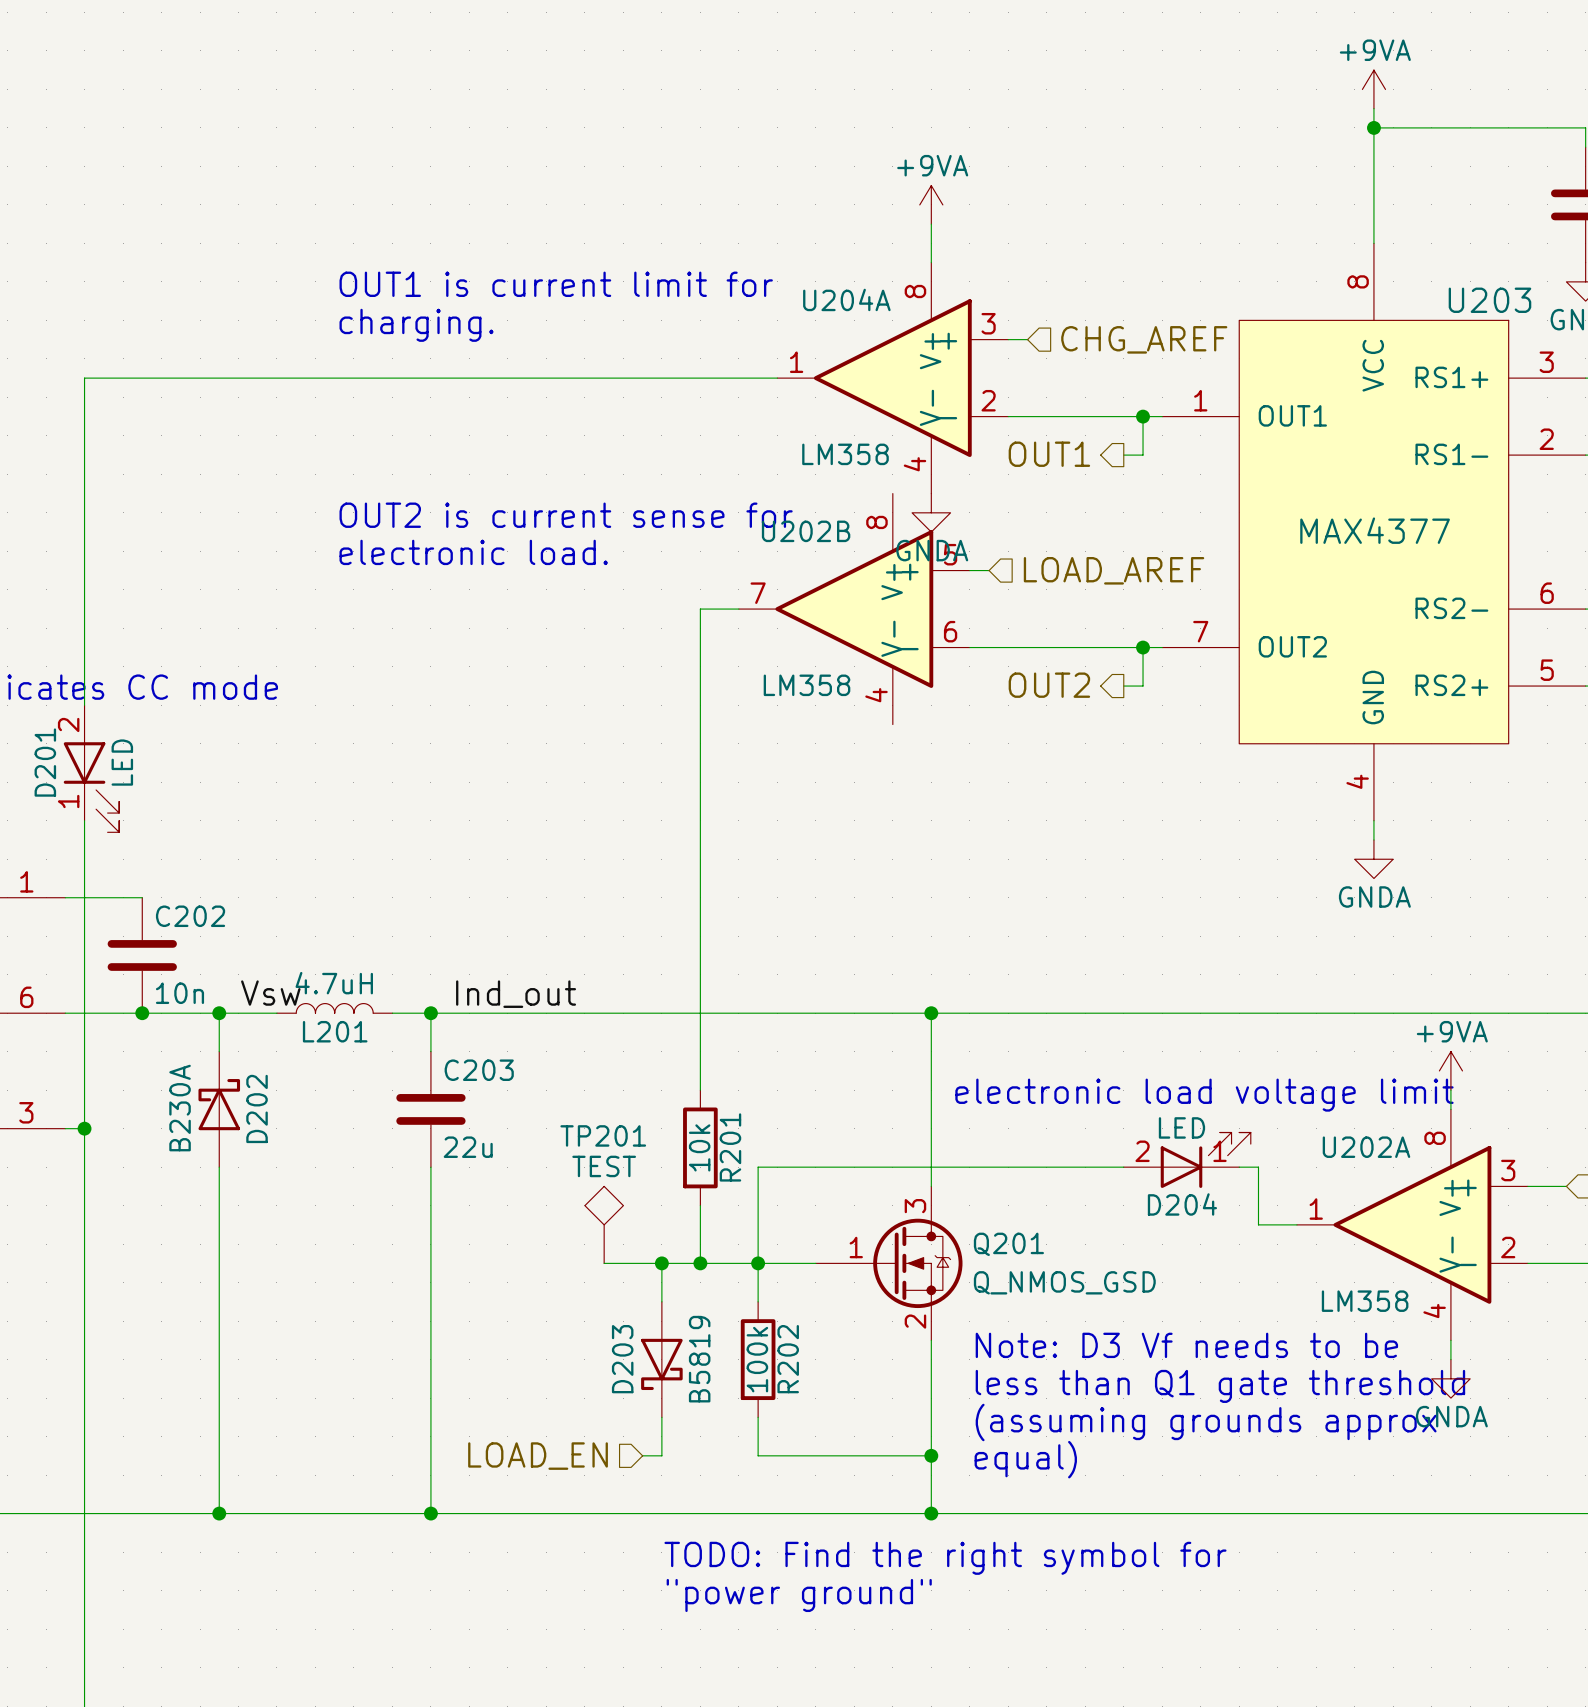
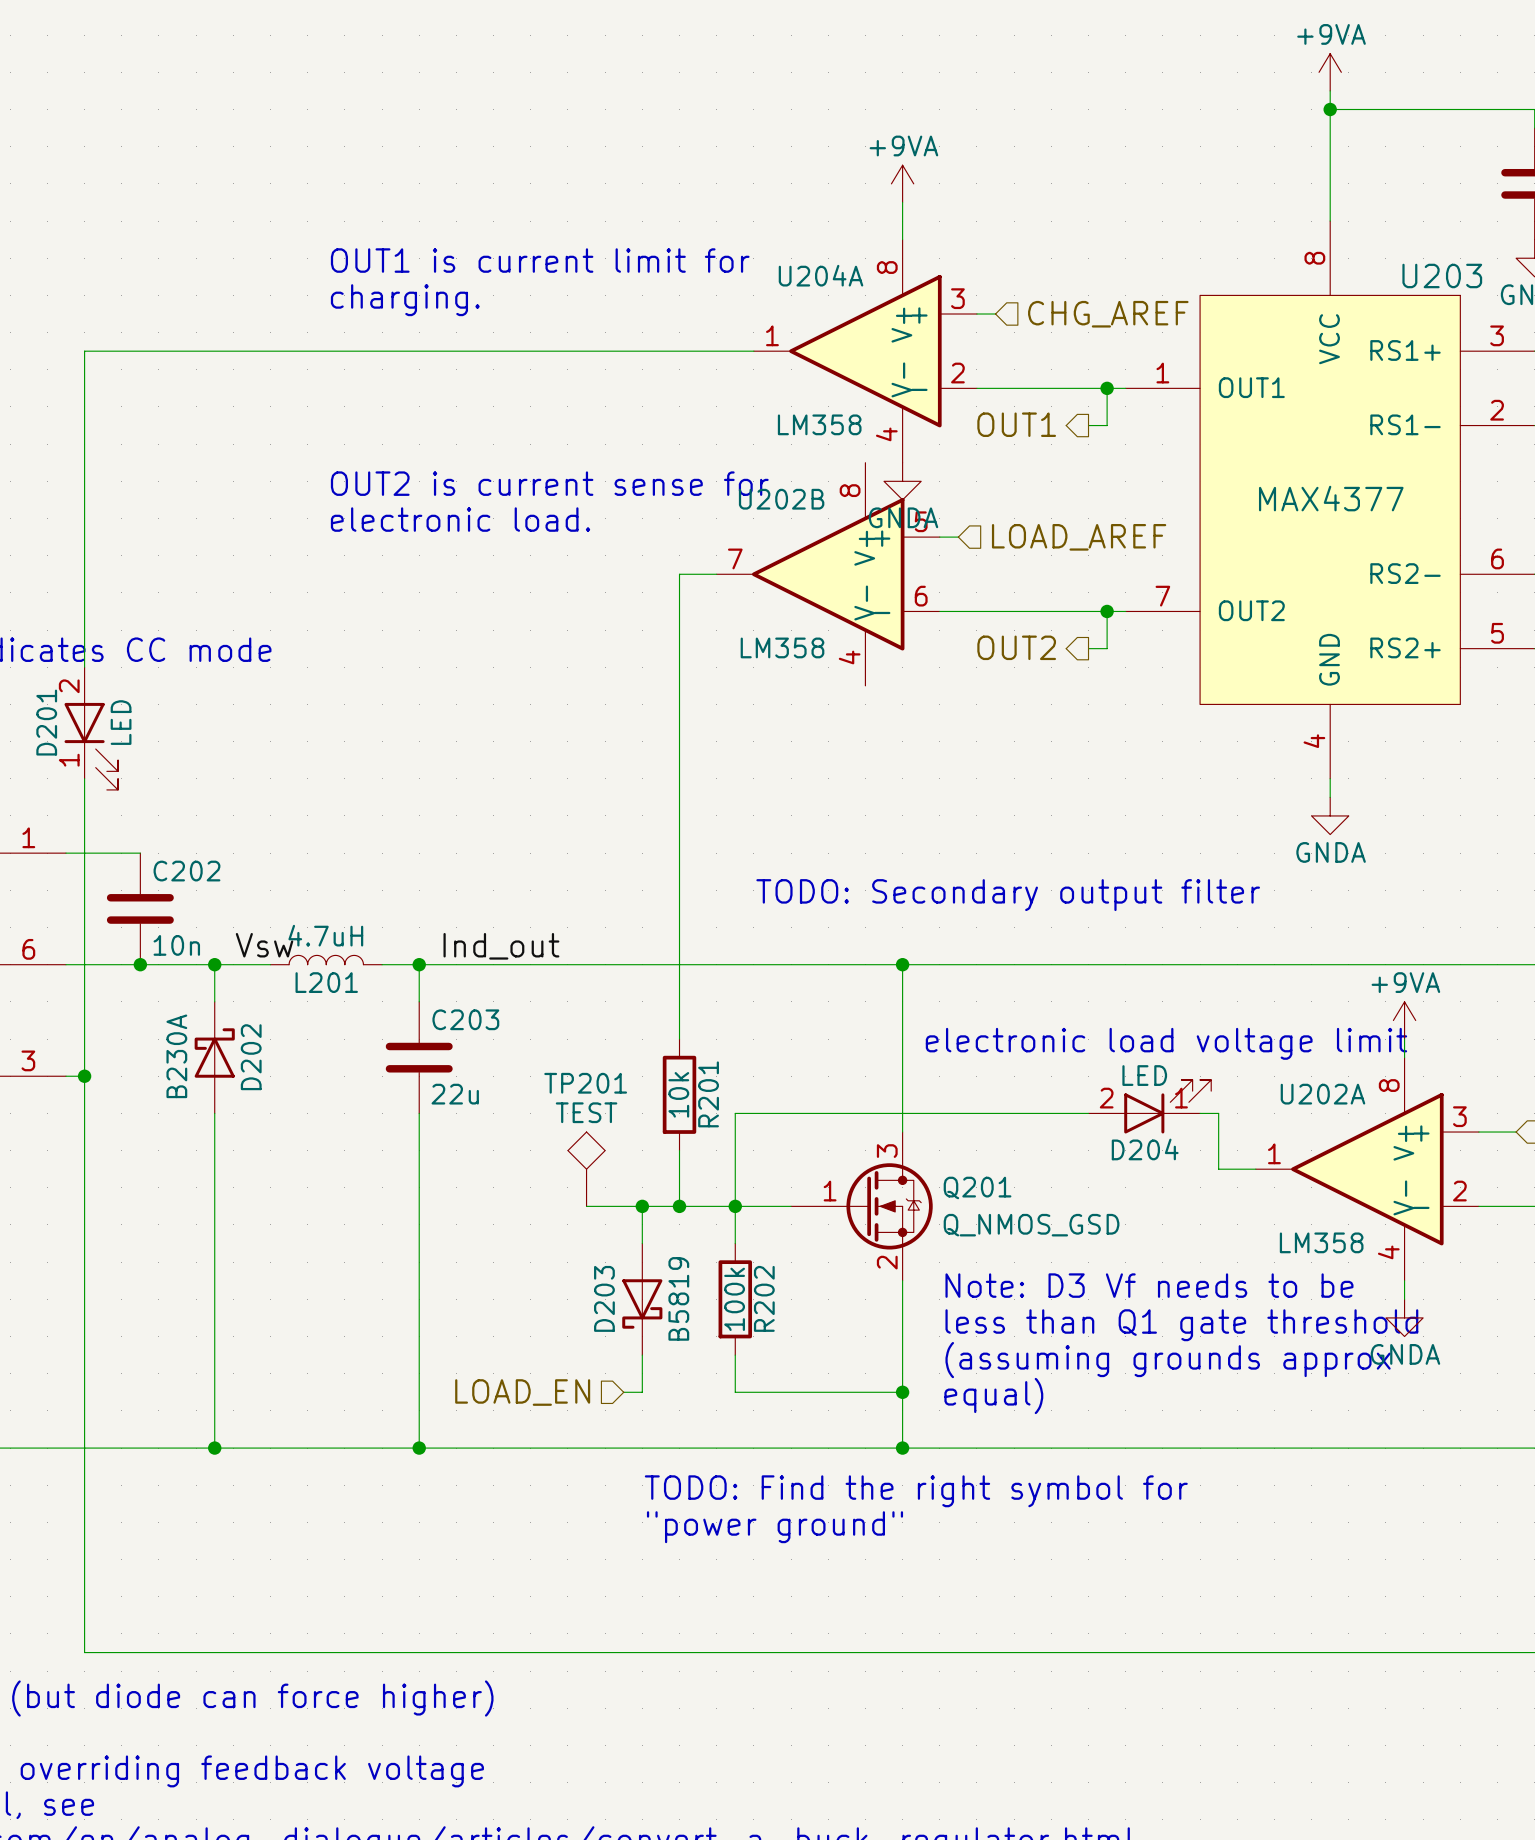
text: none -> TODO: Secondary output filter (1008, 895)

